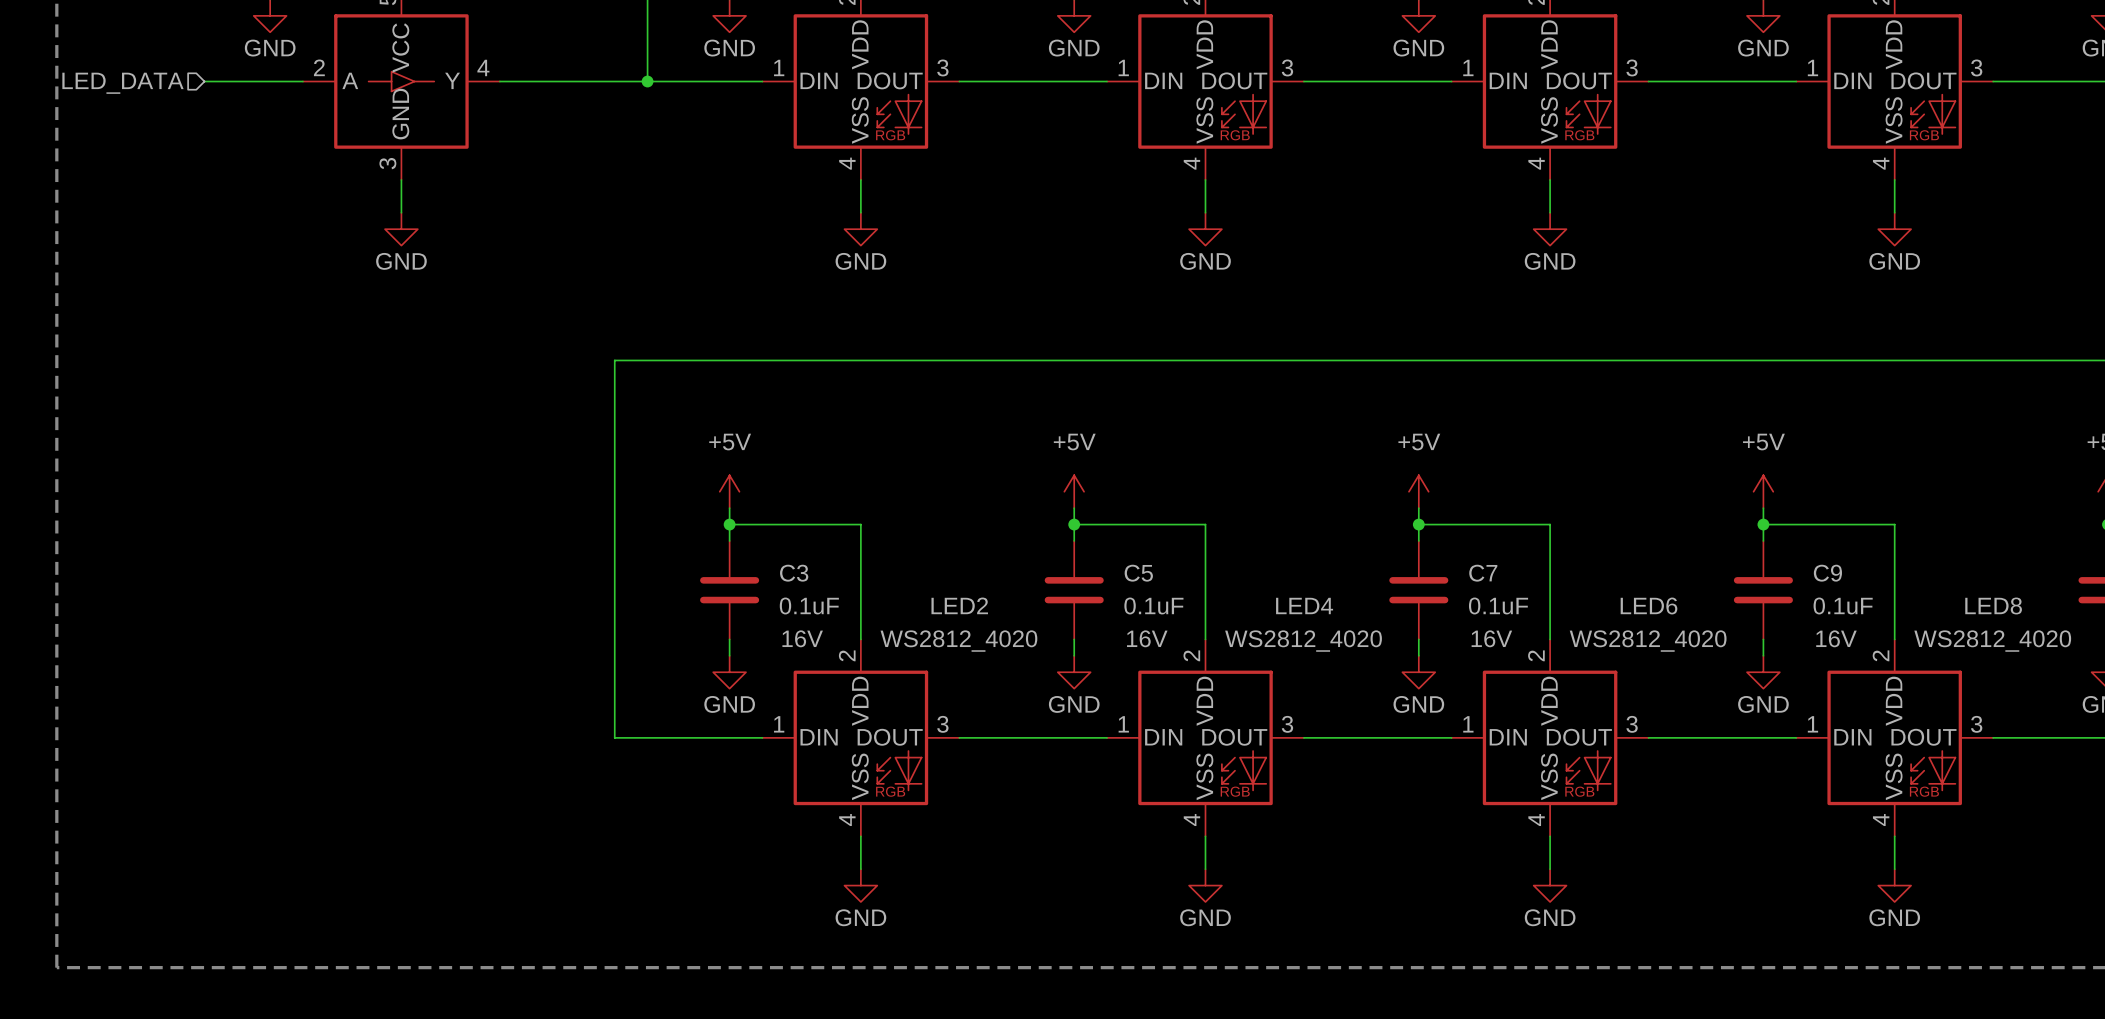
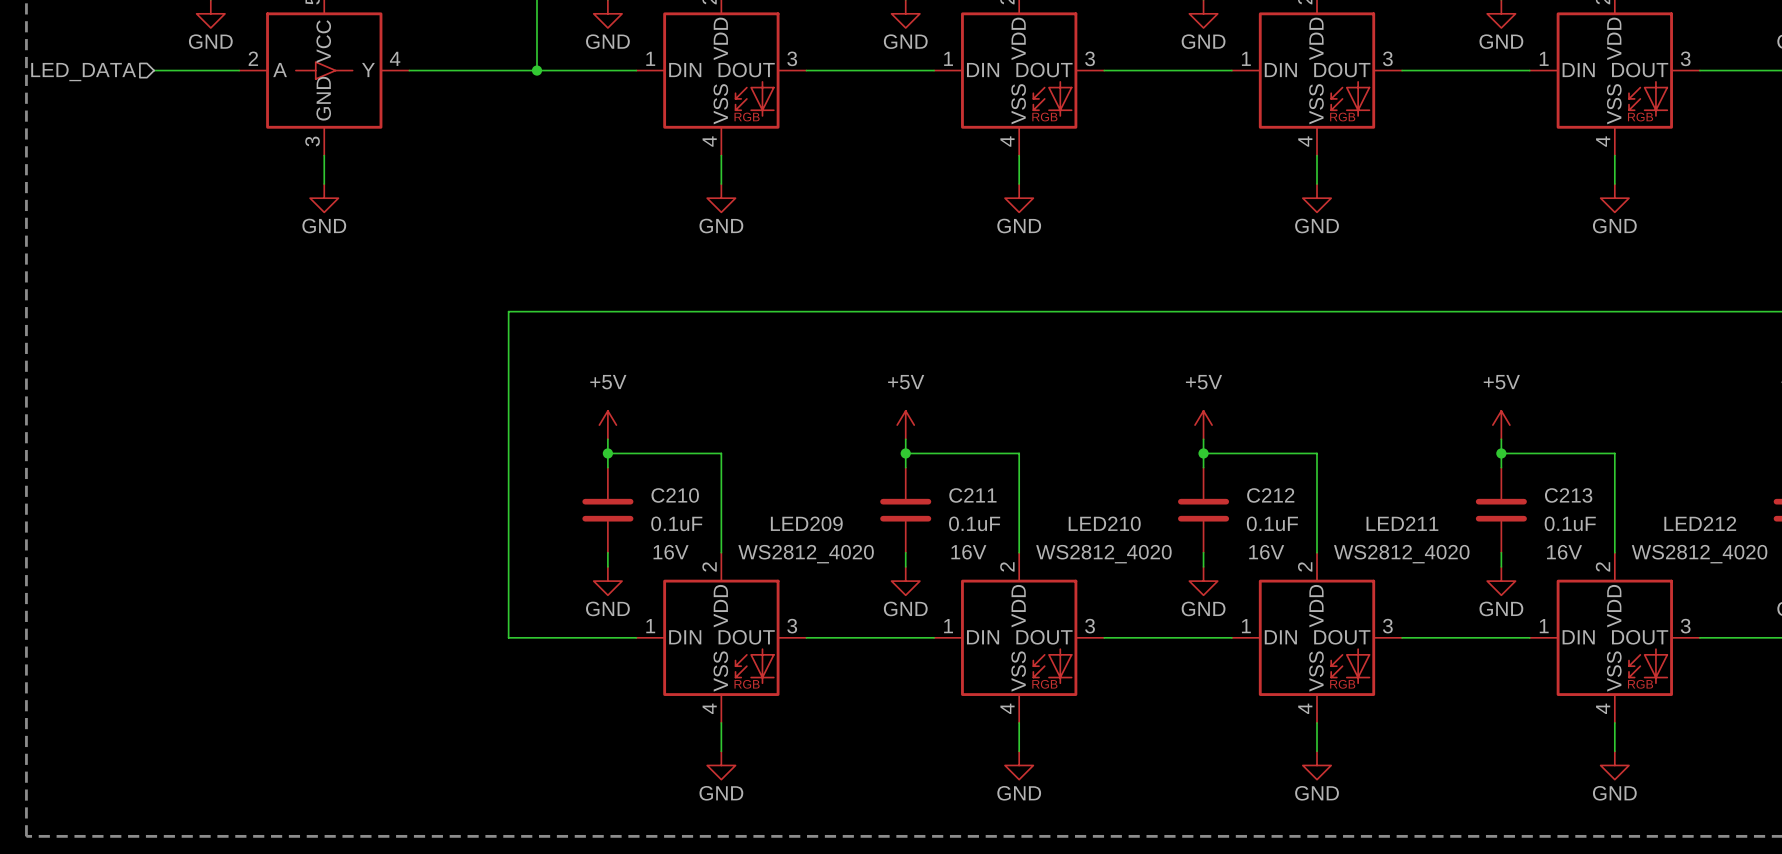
C3 name: C3 (794, 573) -> C210 (675, 495)
C5 name: C5 (1138, 573) -> C211 (972, 495)
C7 name: C7 (1483, 573) -> C212 (1270, 495)
C9 name: C9 (1827, 573) -> C213 (1568, 495)
LED2 name: LED2 (959, 605) -> LED209 (806, 523)
LED6 name: LED6 (1649, 605) -> LED211 (1402, 523)
LED8 name: LED8 (1993, 605) -> LED212 (1700, 523)
LED4 name: LED4 (1304, 606) -> LED210 (1104, 523)

